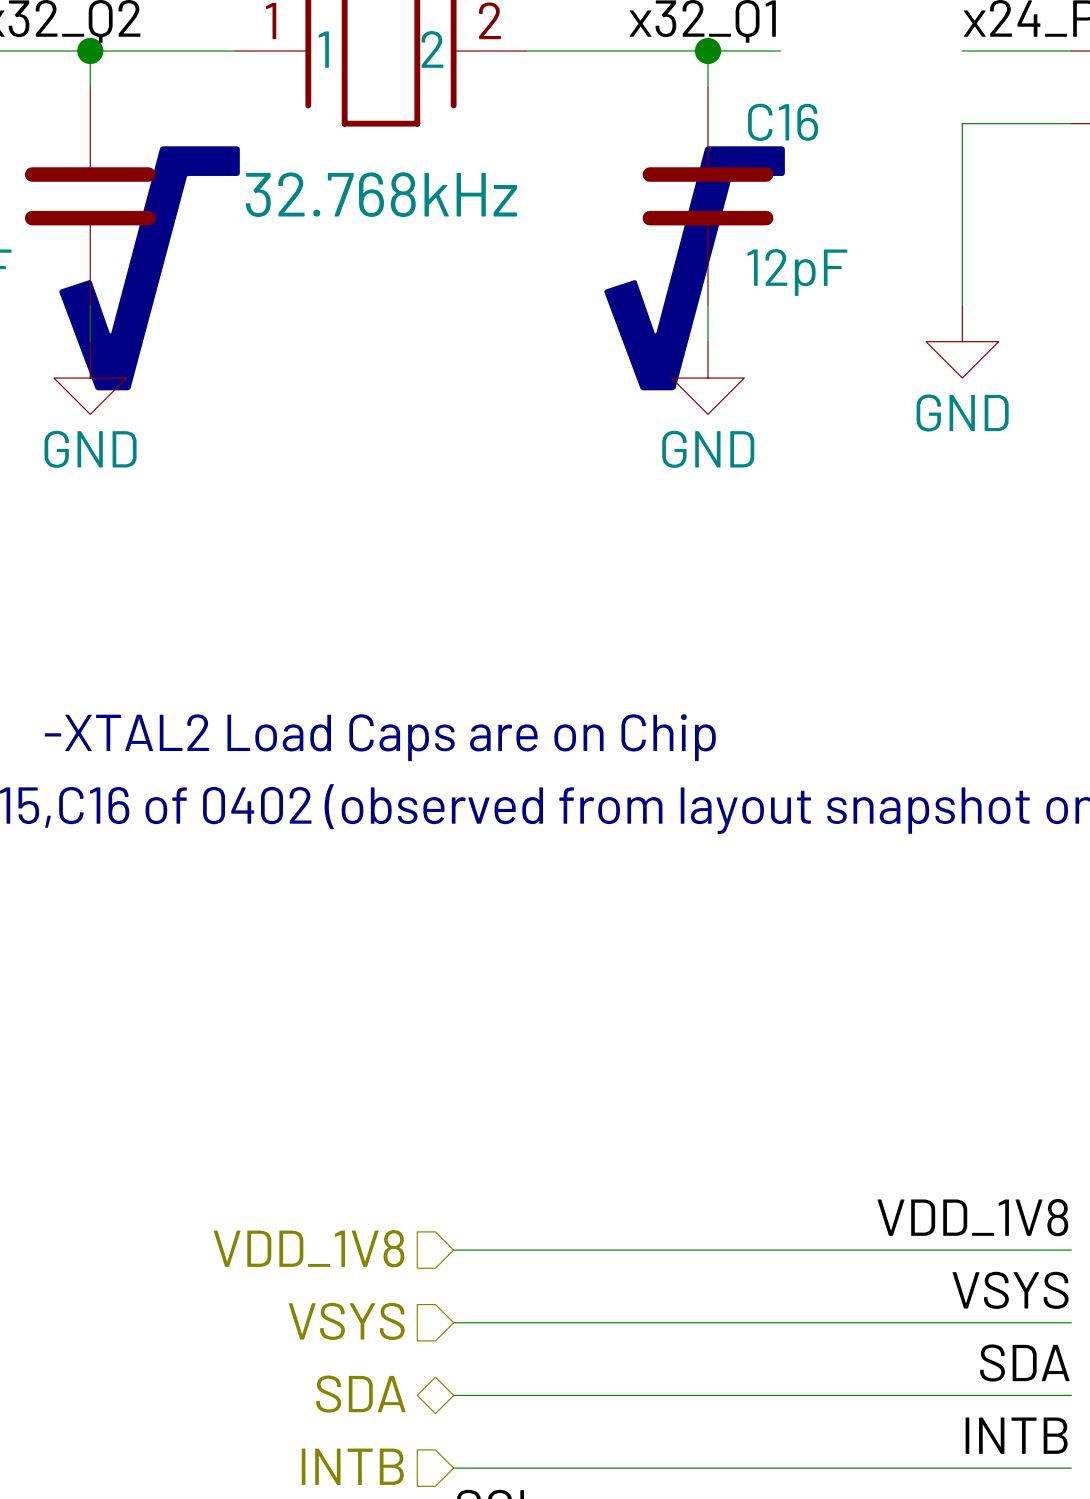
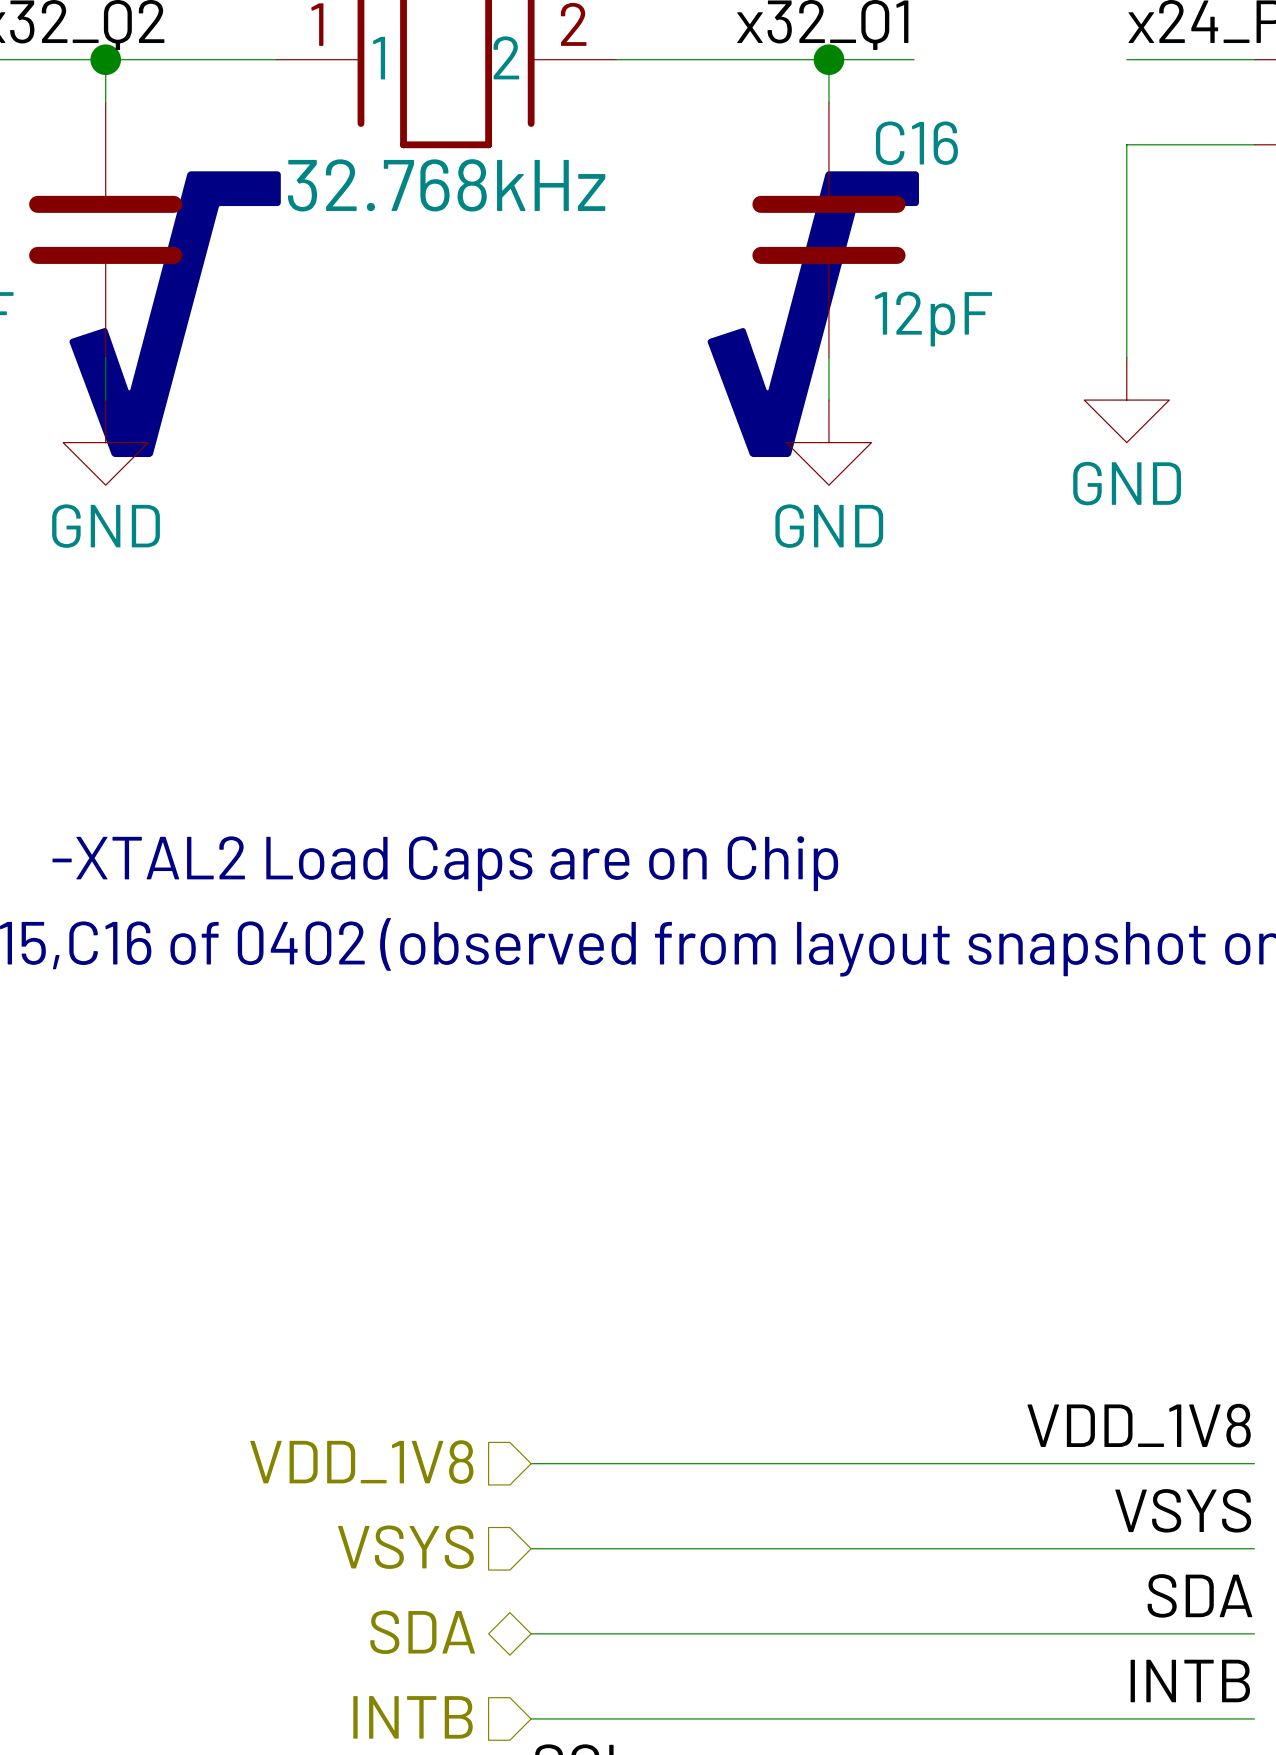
part value position: 32.768kHz (381, 194) -> 32.768kHz (446, 185)

